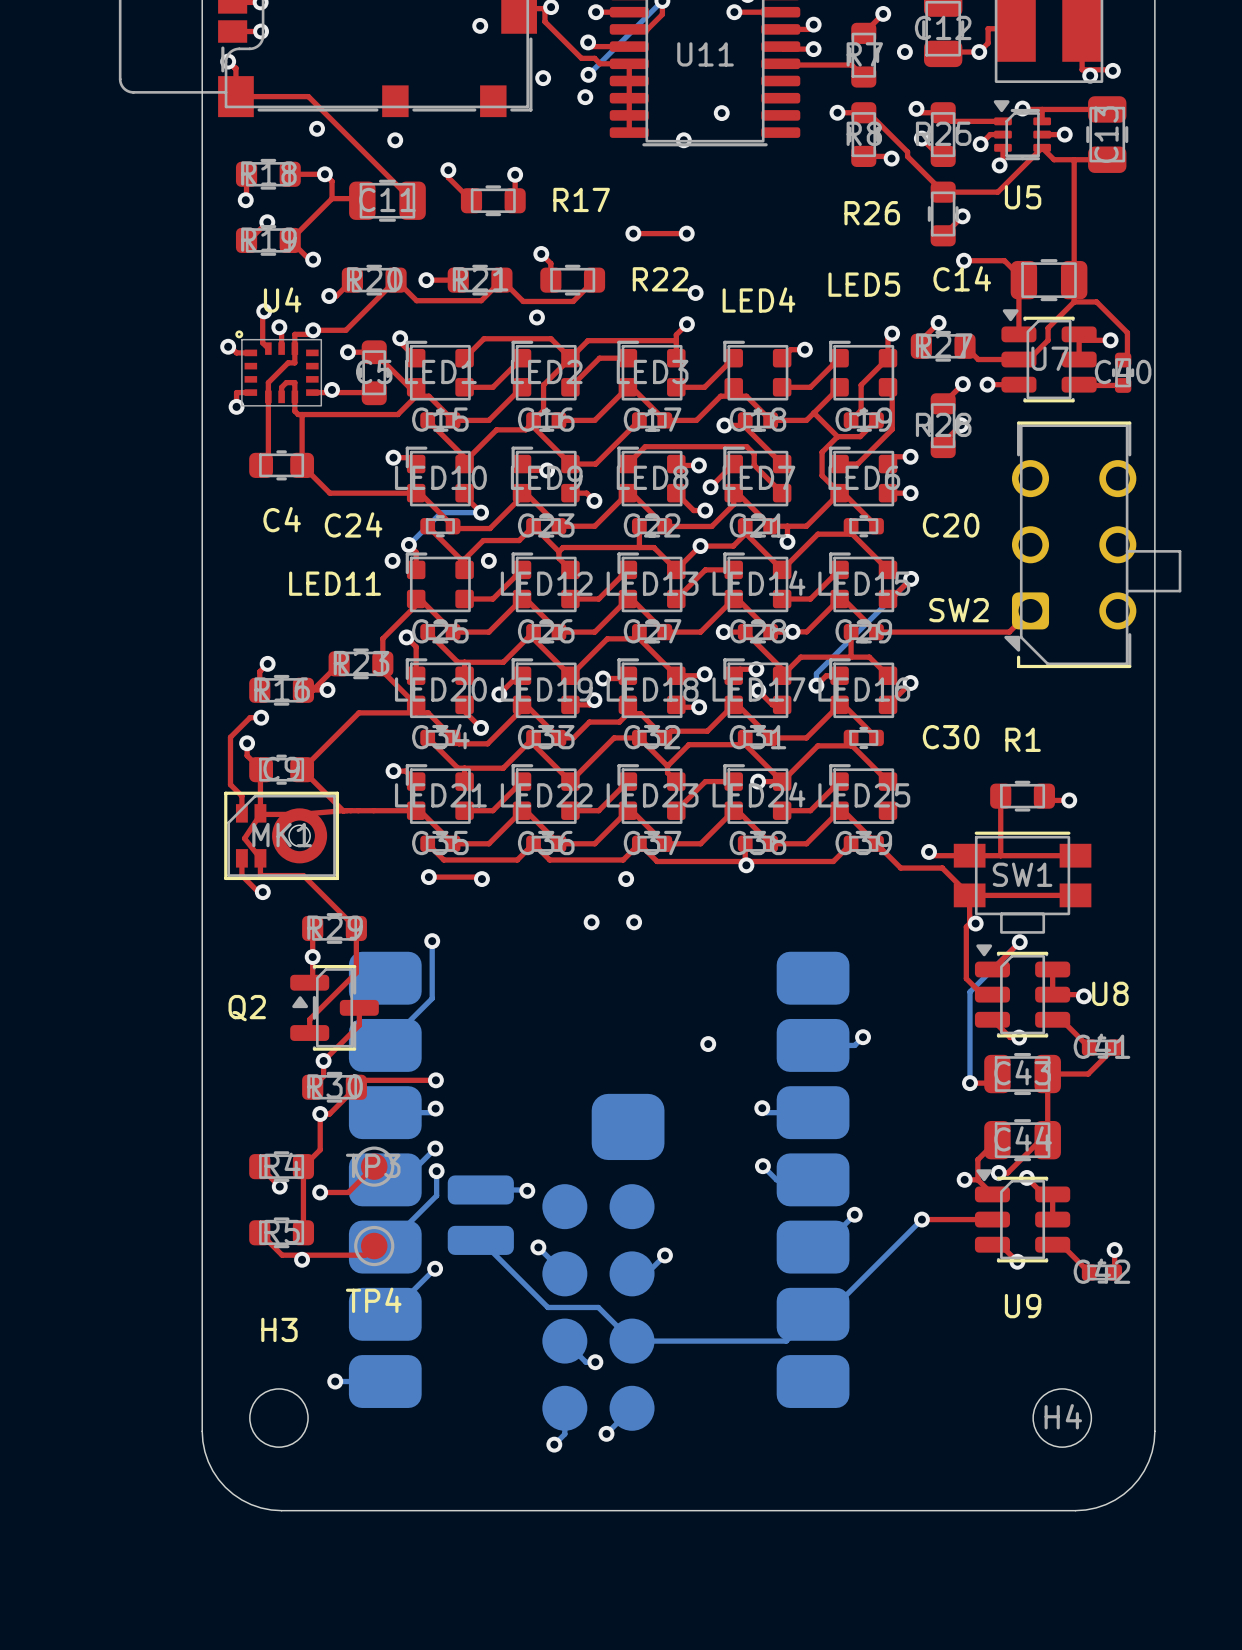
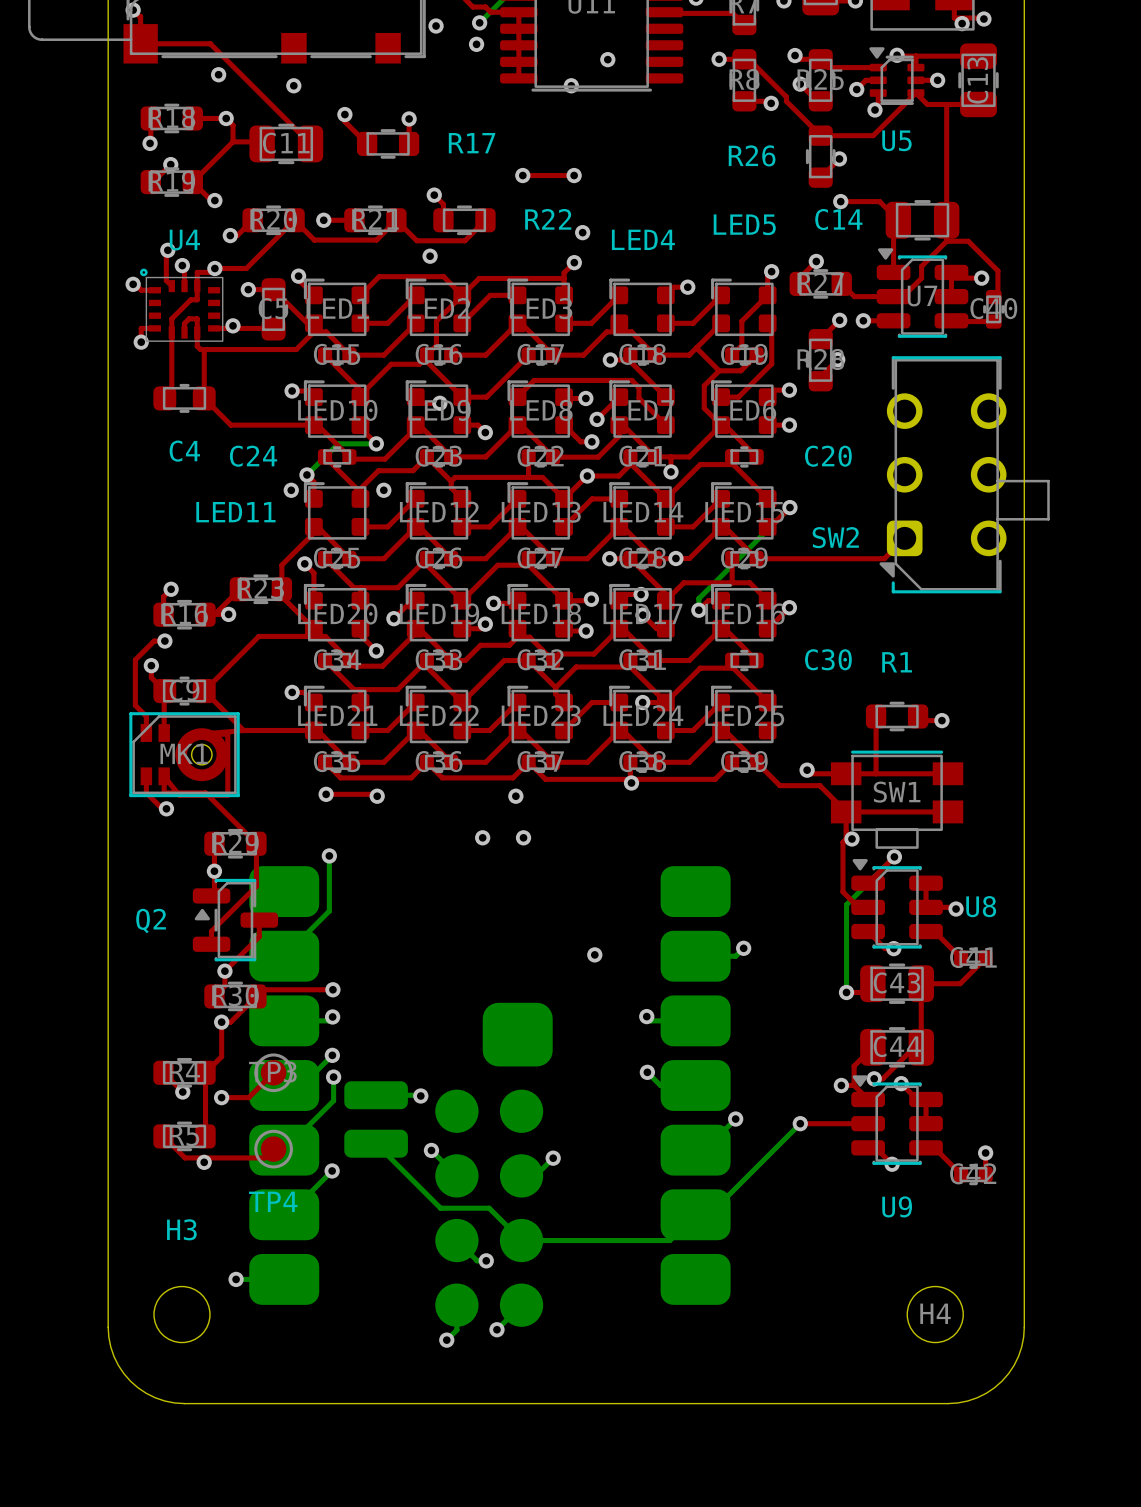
top track: (299, 814) (260, 814) (244, 838) (260, 858) -> (201, 734) (227, 734) (227, 795) (179, 795) (164, 776)

